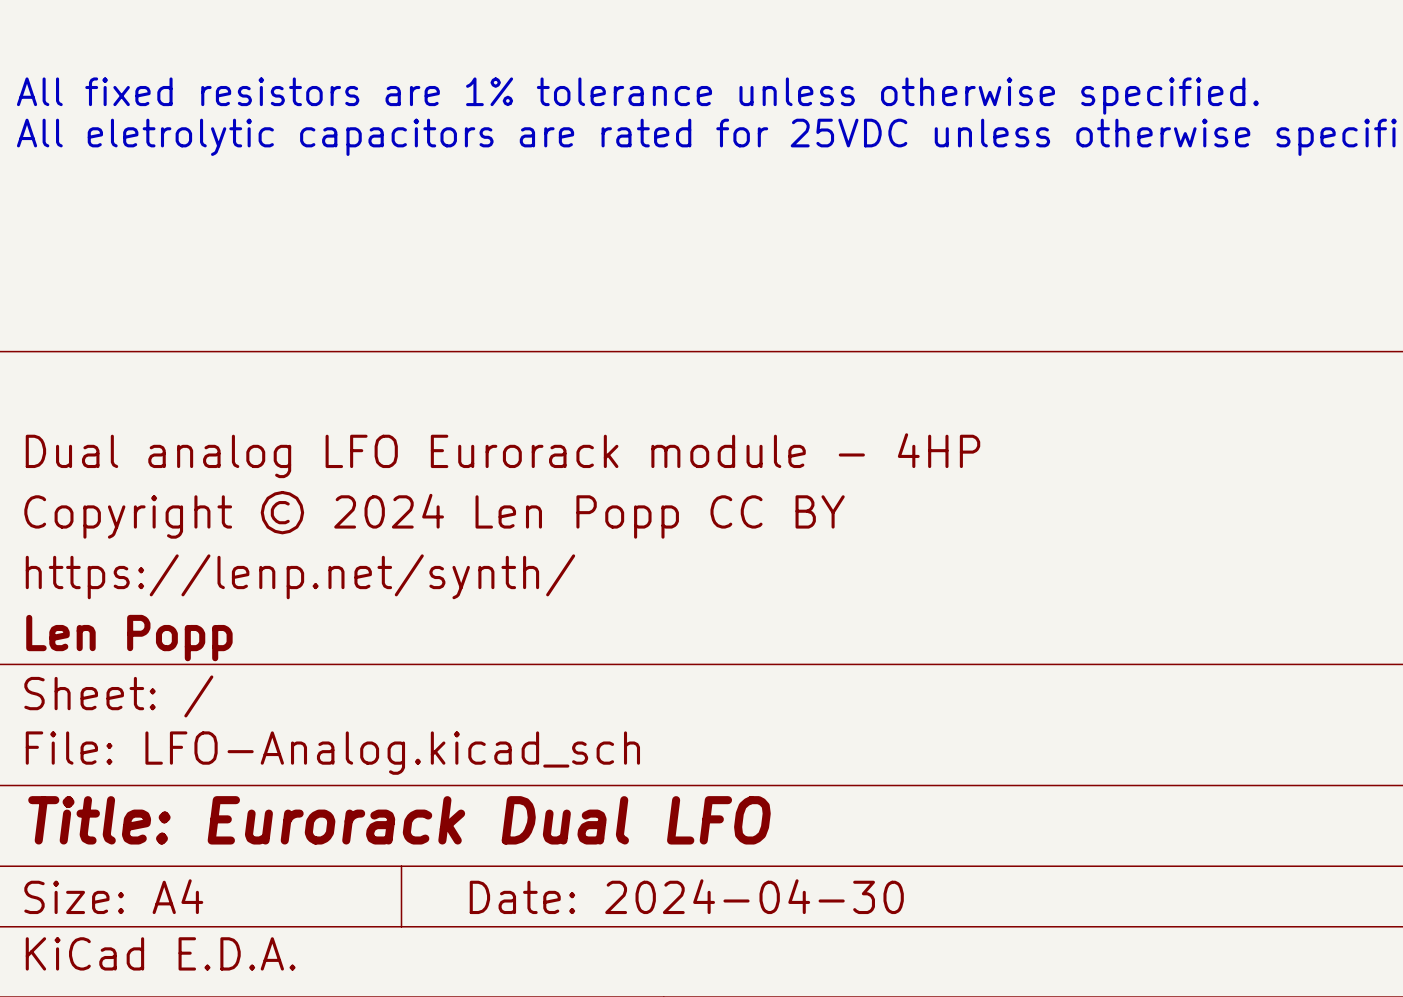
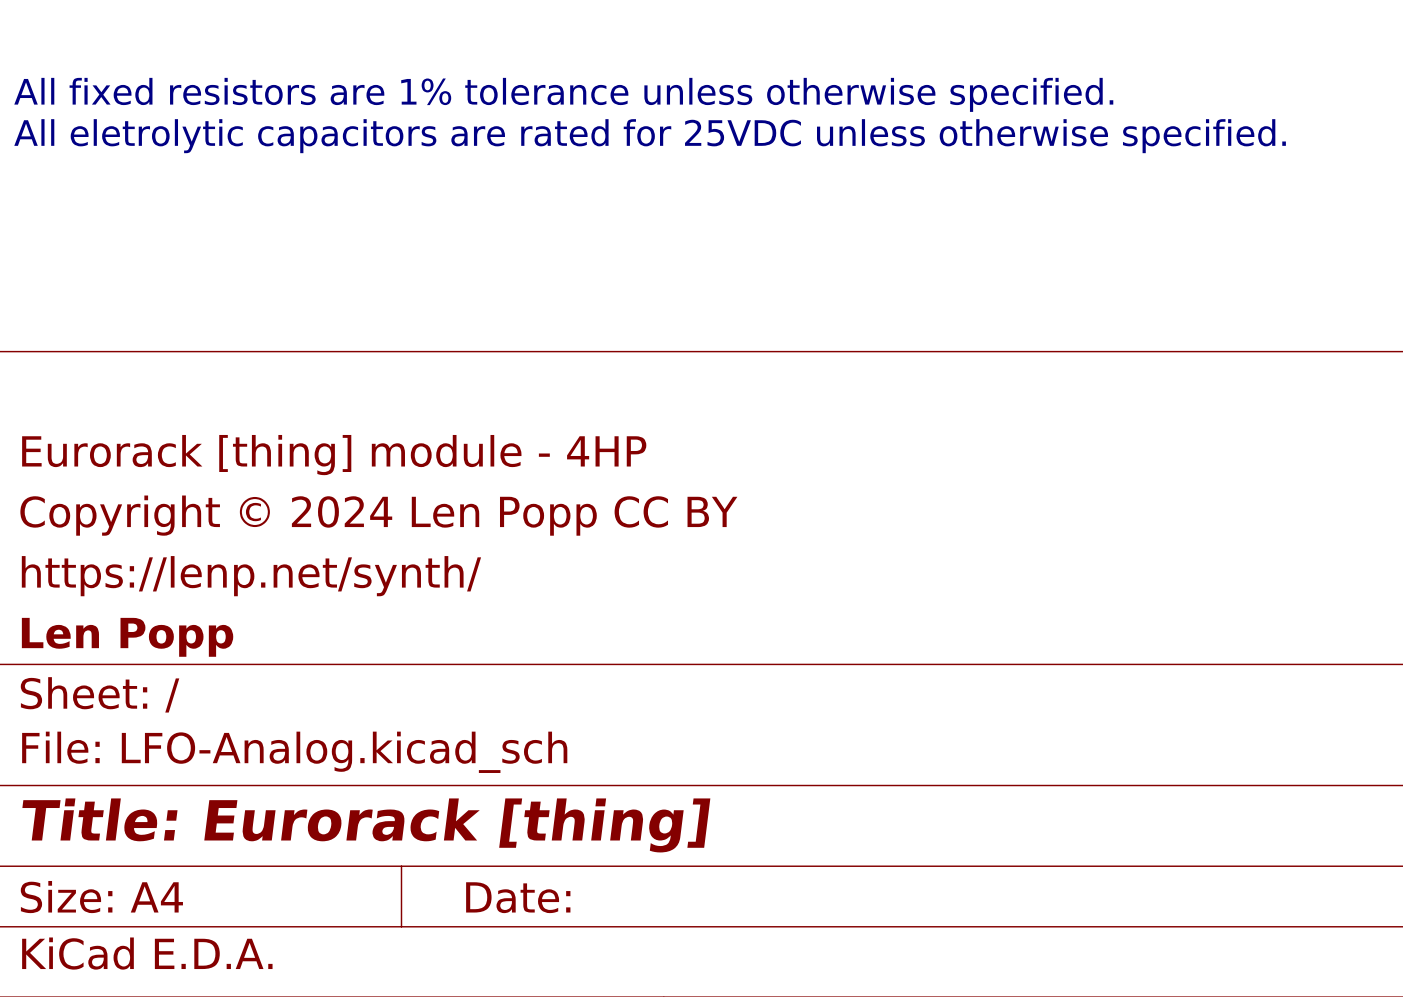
title block: Dual analog LFO Eurorack module - 4HP (502, 455) -> Eurorack [thing] module - 4HP (334, 455)
title block: Title: Eurorack Dual LFO (399, 820) -> Title: Eurorack [thing] (366, 825)
title block: Date: 2024-04-30 (686, 896) -> Date: (518, 897)

